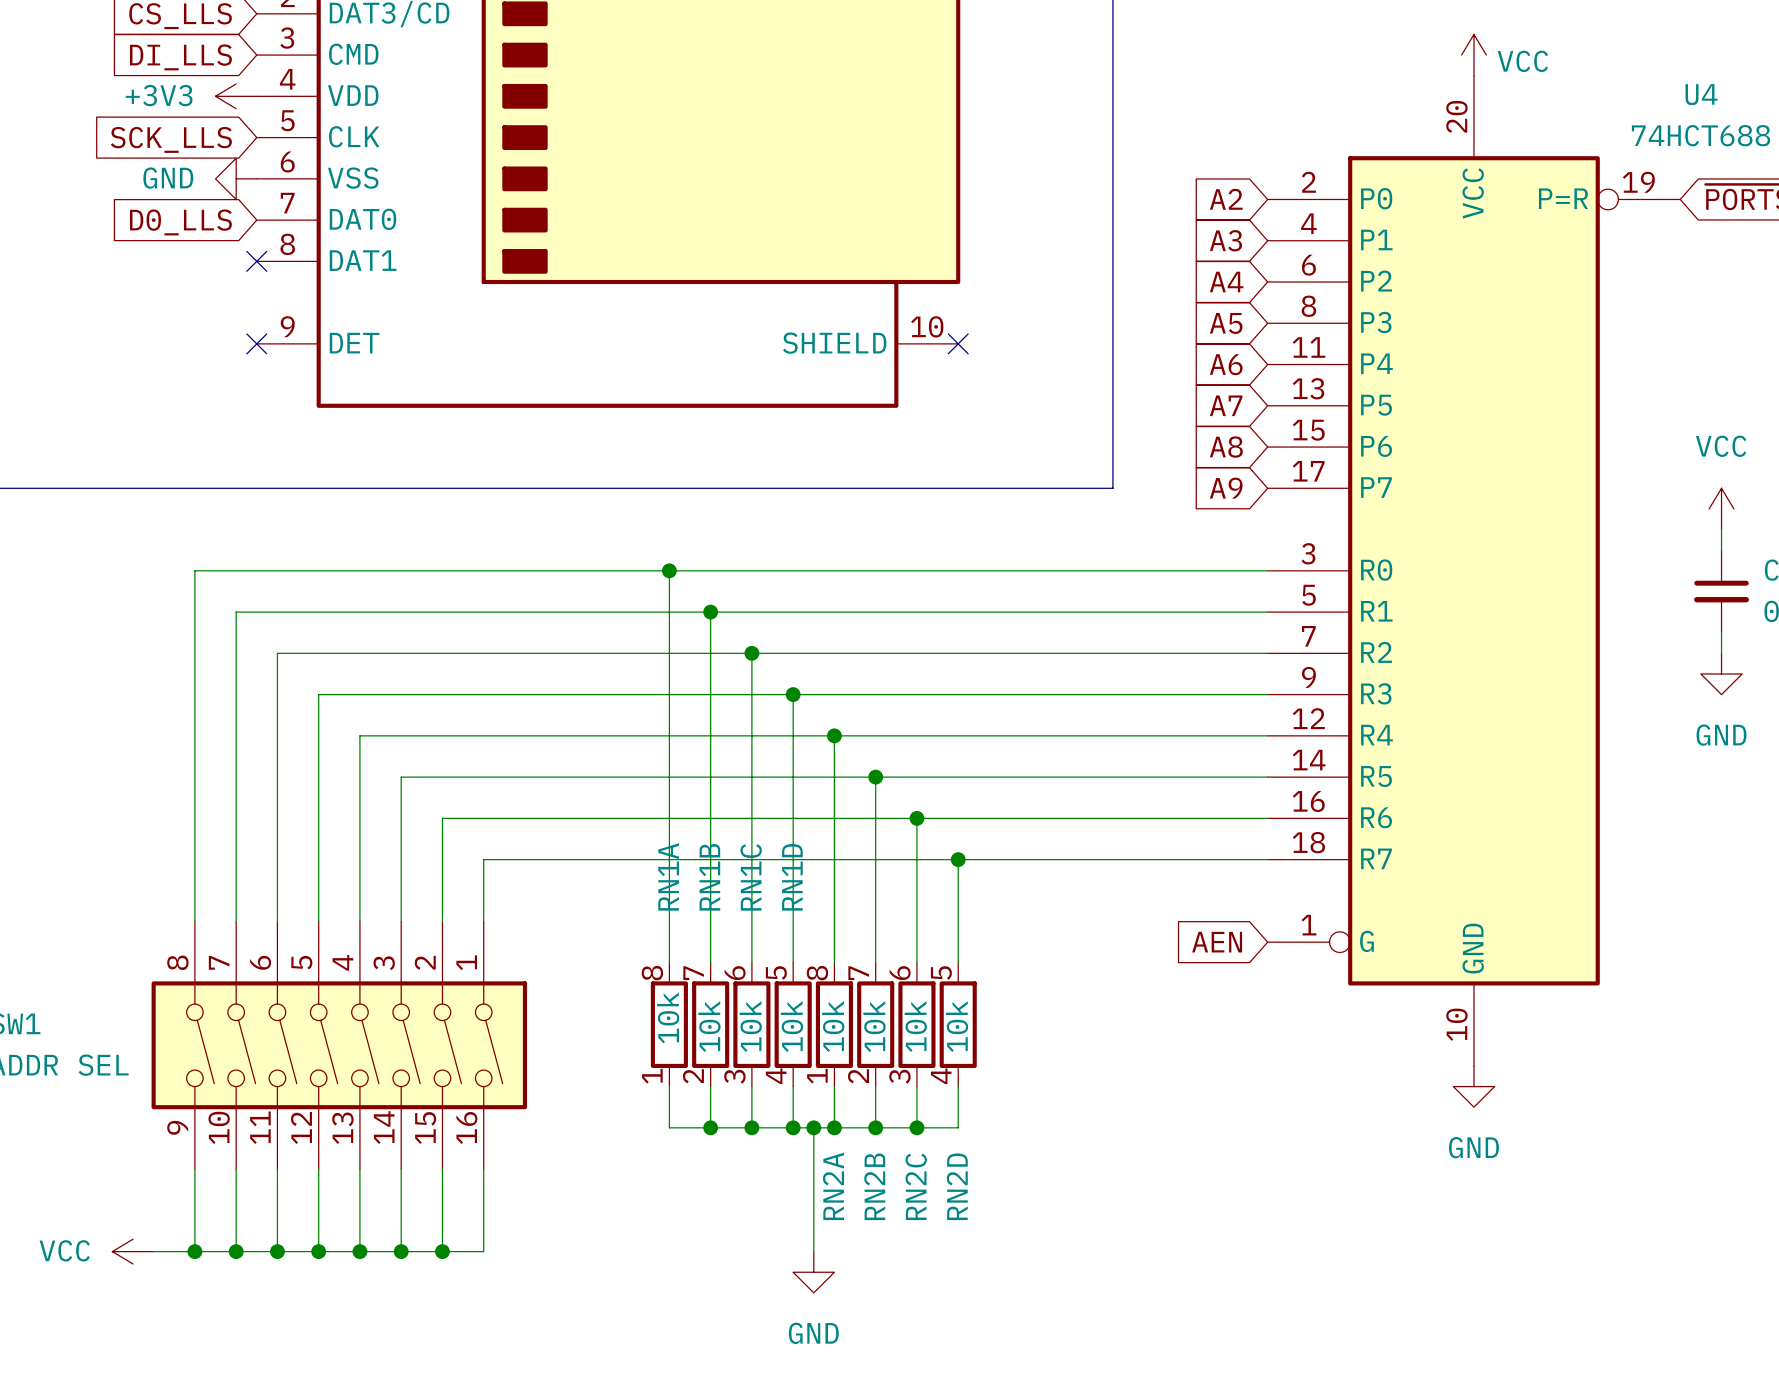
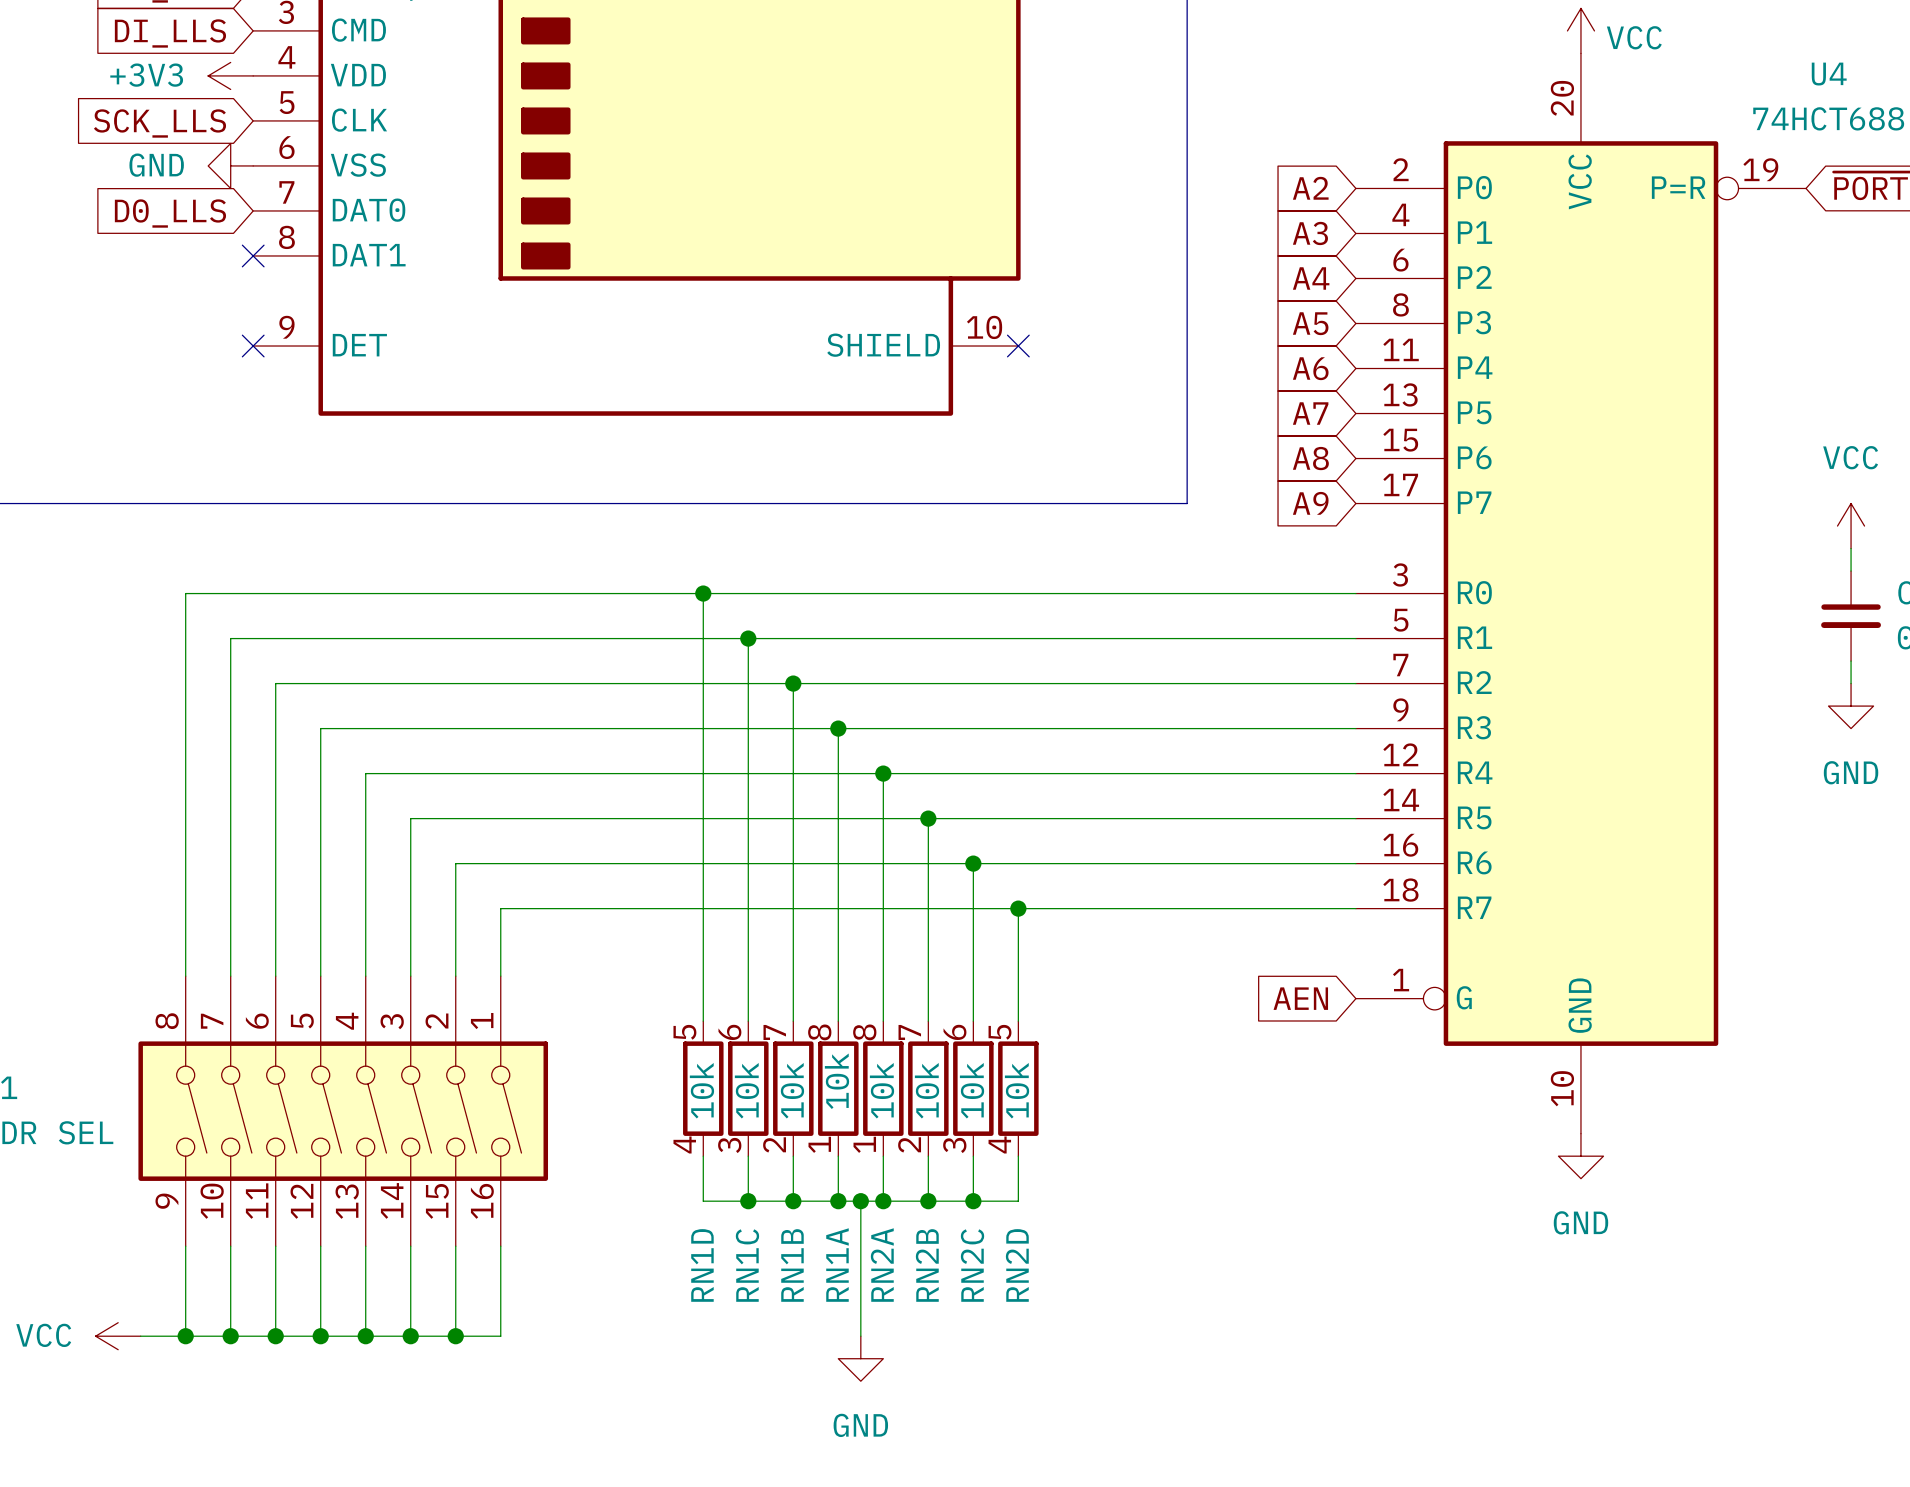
RN1A name position: RN1A (668, 876) -> RN1A (837, 1265)
RN1B name position: RN1B (709, 877) -> RN1B (792, 1265)
RN1C name position: RN1C (751, 877) -> RN1C (747, 1265)
RN1D name position: RN1D (792, 877) -> RN1D (702, 1265)
RN1A position: (669, 1024) -> (838, 1088)
RN1B position: (710, 1024) -> (793, 1088)
RN1C position: (751, 1024) -> (748, 1088)
RN1D position: (793, 1024) -> (703, 1088)

